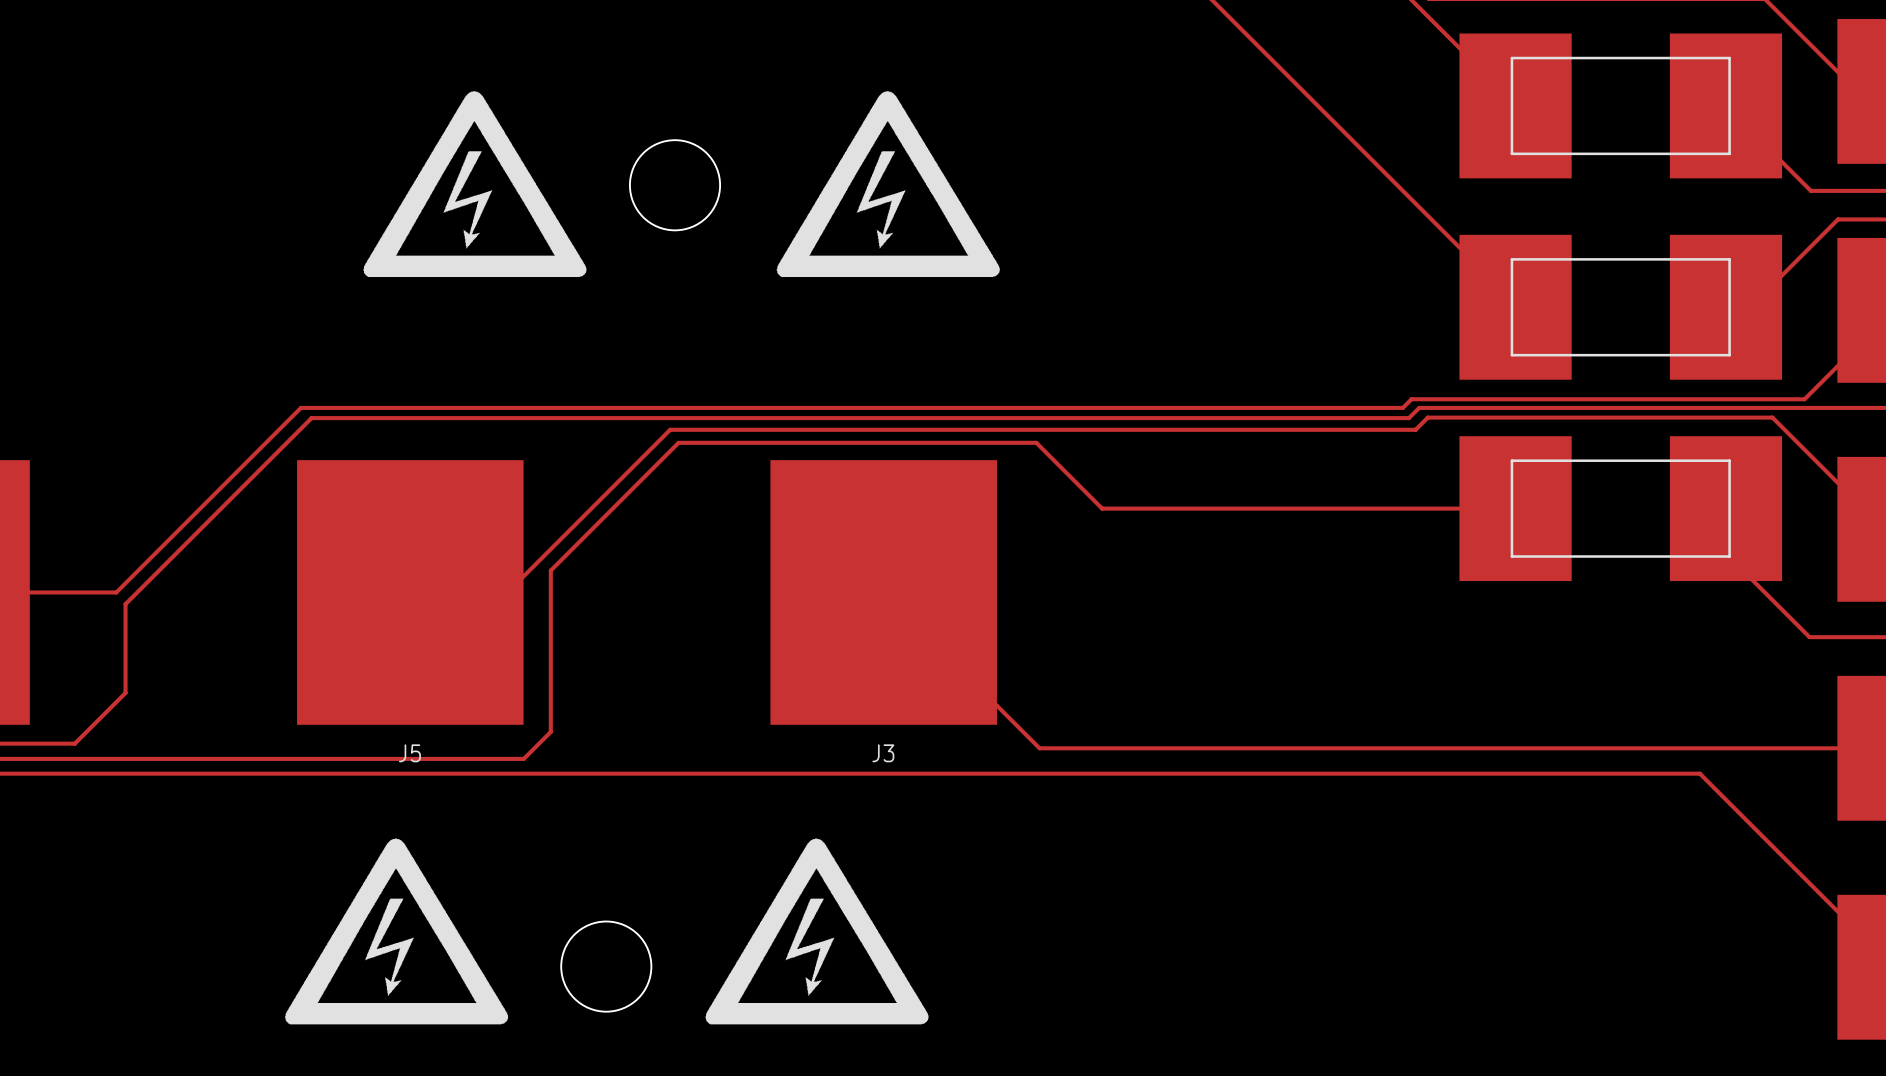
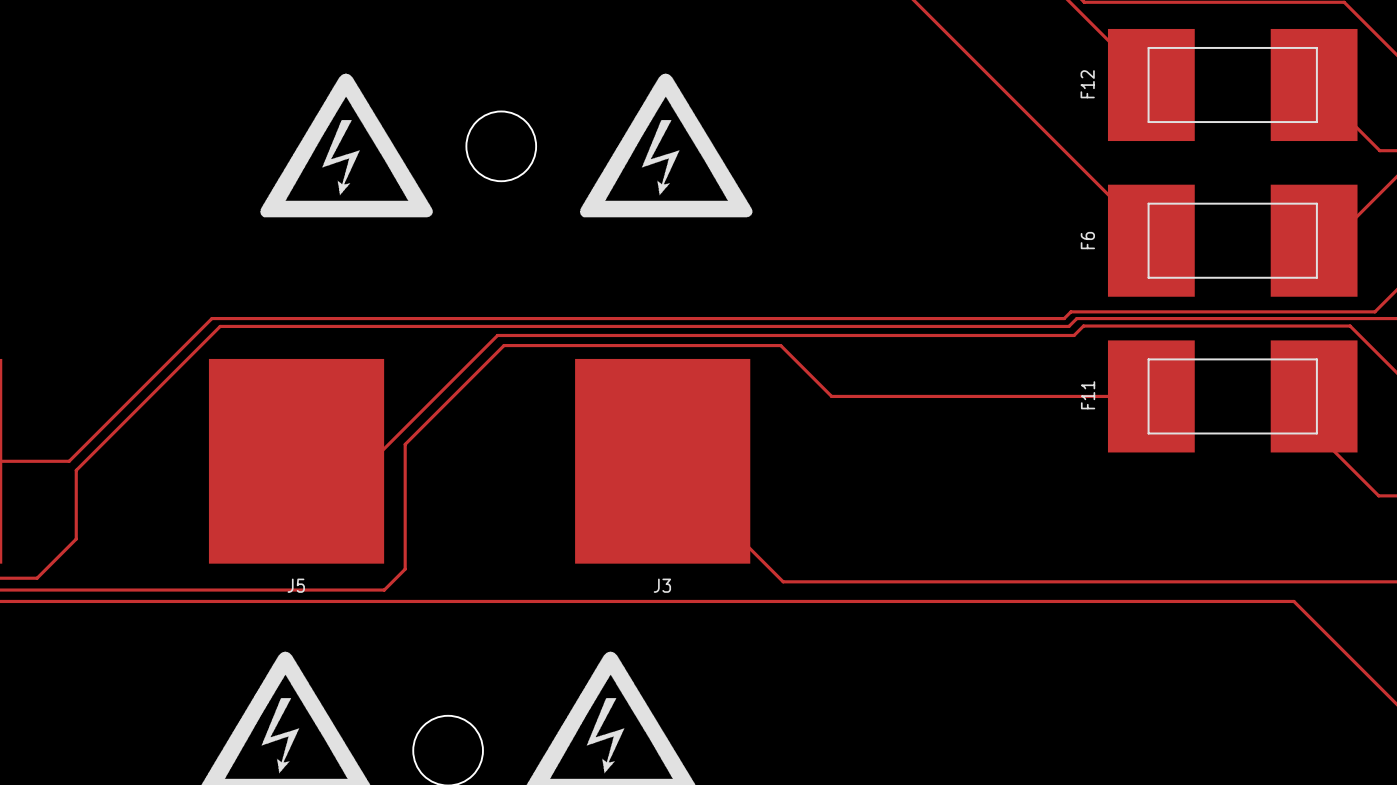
F12 name: none -> F12 (1087, 84)
F6 name: none -> F6 (1087, 240)
F11 name: none -> F11 (1088, 395)

